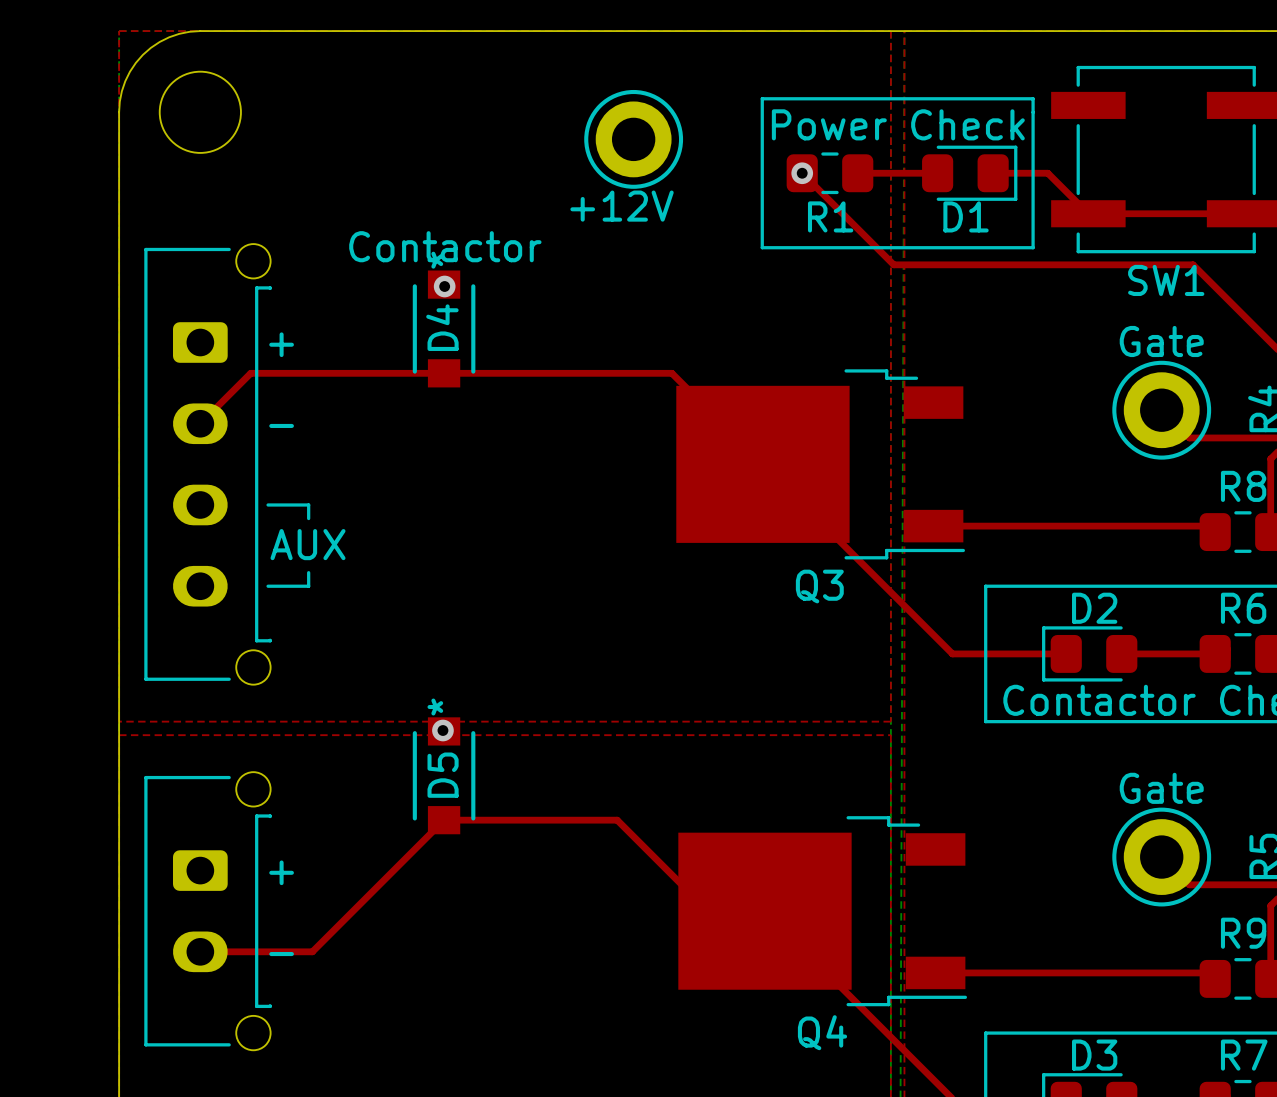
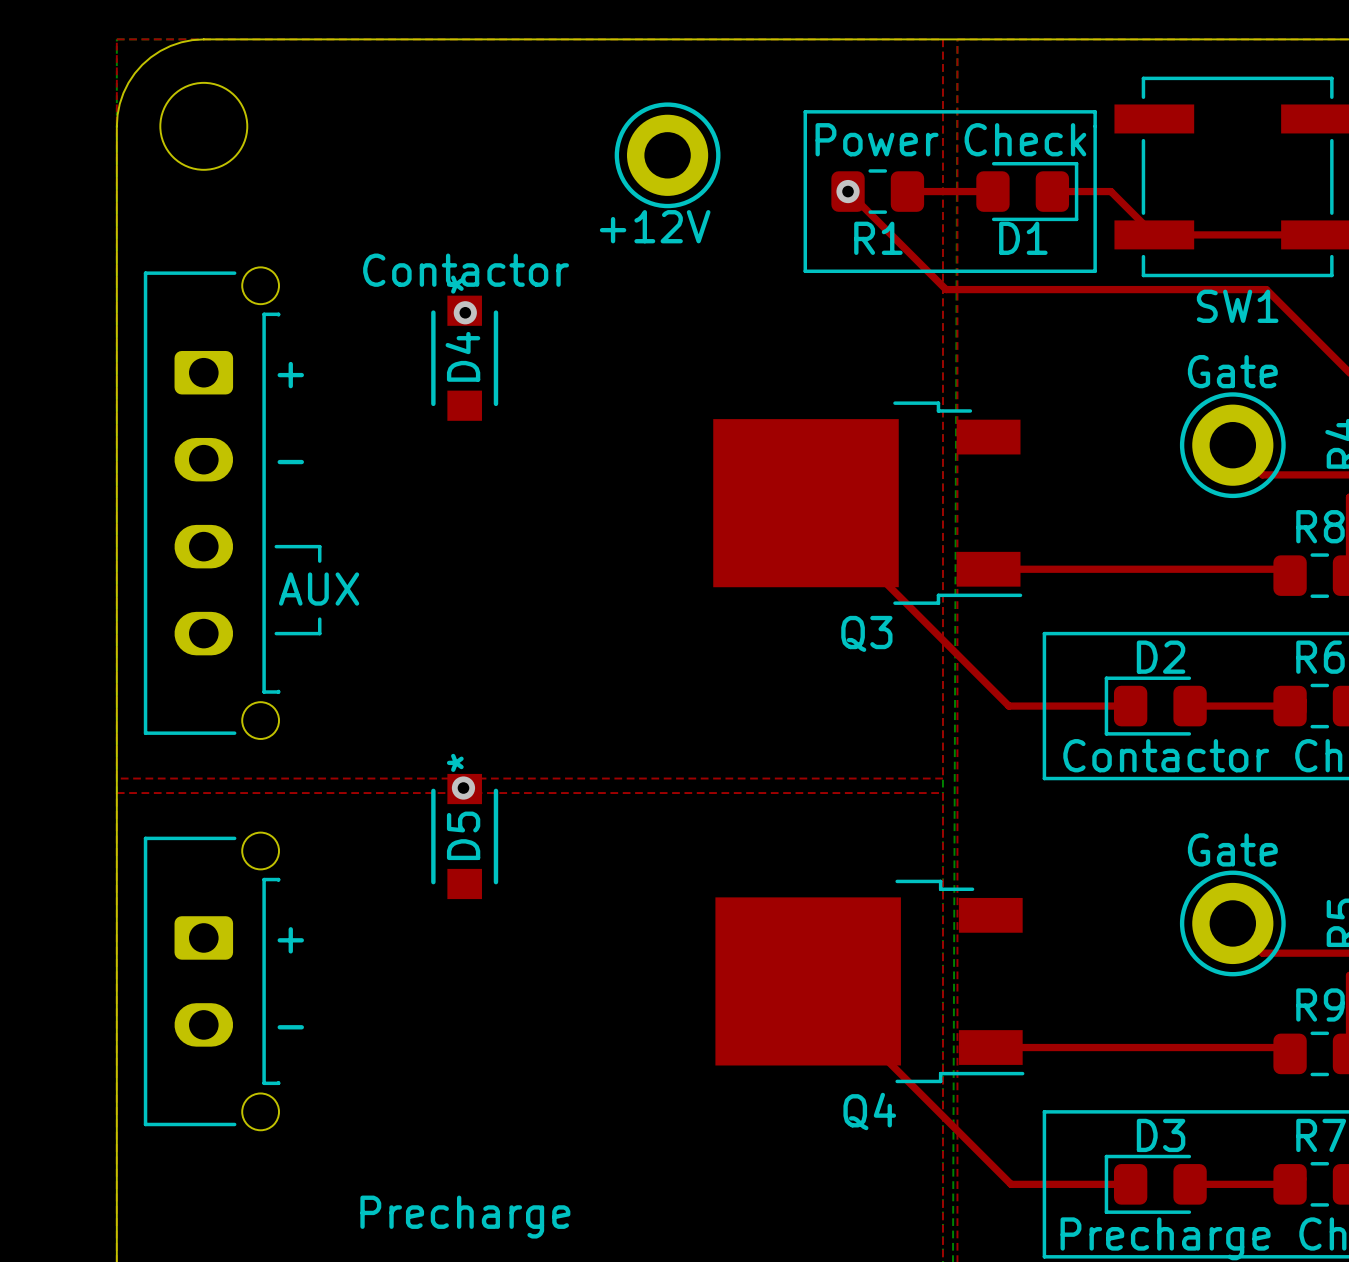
top track: (200, 423) (250, 373) (671, 373) (762, 464) -> none
top track: (708, 911) (617, 820) (444, 820) (312, 951) (200, 951) -> none

